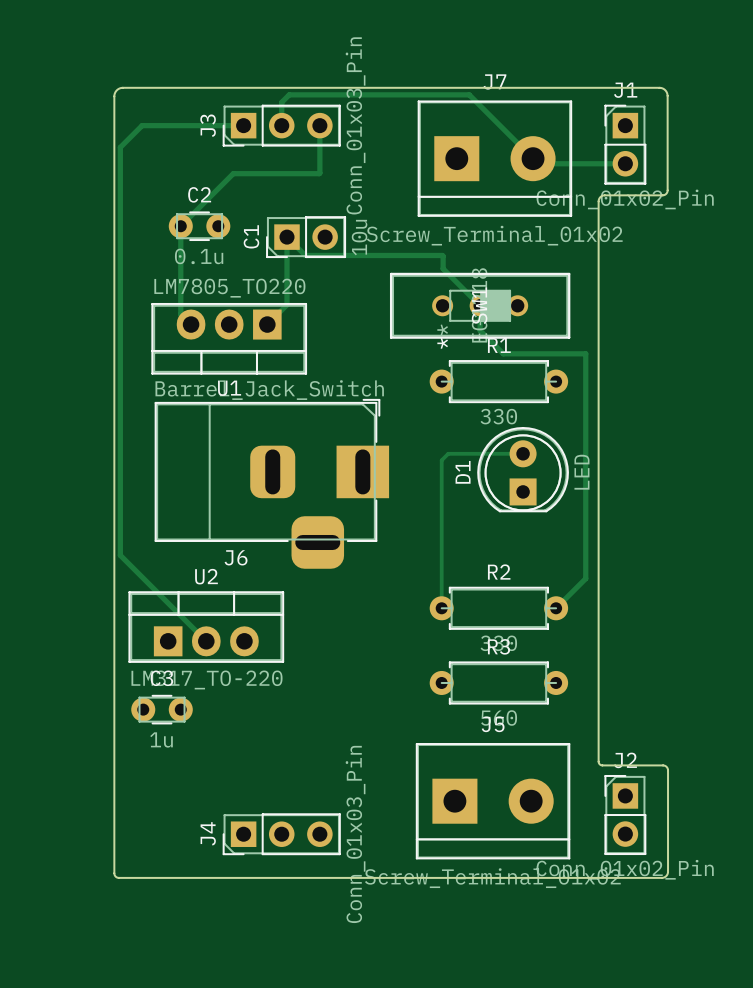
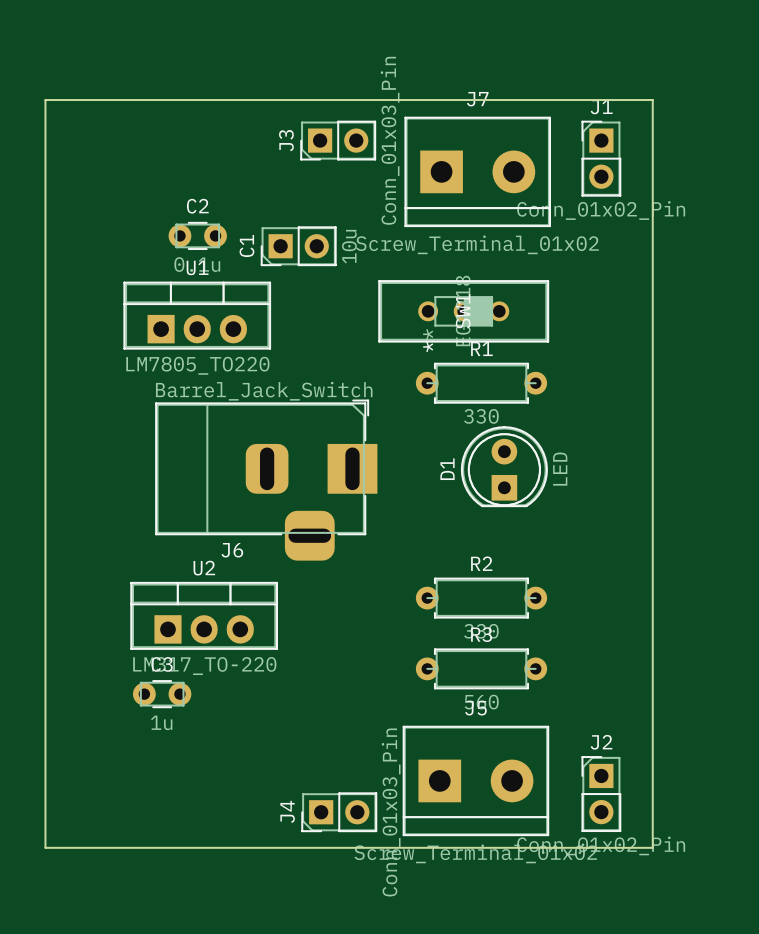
board edge: none -> (45, 100) (652, 100) (652, 847) (45, 847) (45, 100)
board edge: (122, 87) (659, 87) (666, 91) (666, 193) (662, 195) (603, 195) (598, 200) (598, 761) (601, 765) (663, 765) (667, 767) (668, 871) (666, 876) (661, 877) (118, 877) (114, 873) -> none
board edge: (122, 87) (116, 90) (114, 96) (114, 873) -> none
J3 footprint: [222, 104, 341, 147] -> [300, 120, 377, 161]
track: (243, 125) (142, 125) (120, 147) (120, 555) (206, 641) -> none
track: (281, 125) (281, 102) (289, 94) (469, 94) (538, 163) (625, 163) -> none
track: (319, 125) (319, 173) (233, 173) (180, 226) (180, 314) (191, 324) -> none
track: (267, 324) (287, 304) (287, 237) (305, 255) (442, 255) (443, 268) (480, 305) (480, 330) (503, 353) (585, 353) (585, 578) (556, 608) -> none
U1 rotation: 0° (229, 338) -> 180° (197, 315)
track: (523, 453) (448, 453) (441, 460) (441, 608) -> none
J4 footprint: [222, 813, 341, 856] -> [301, 792, 378, 833]

